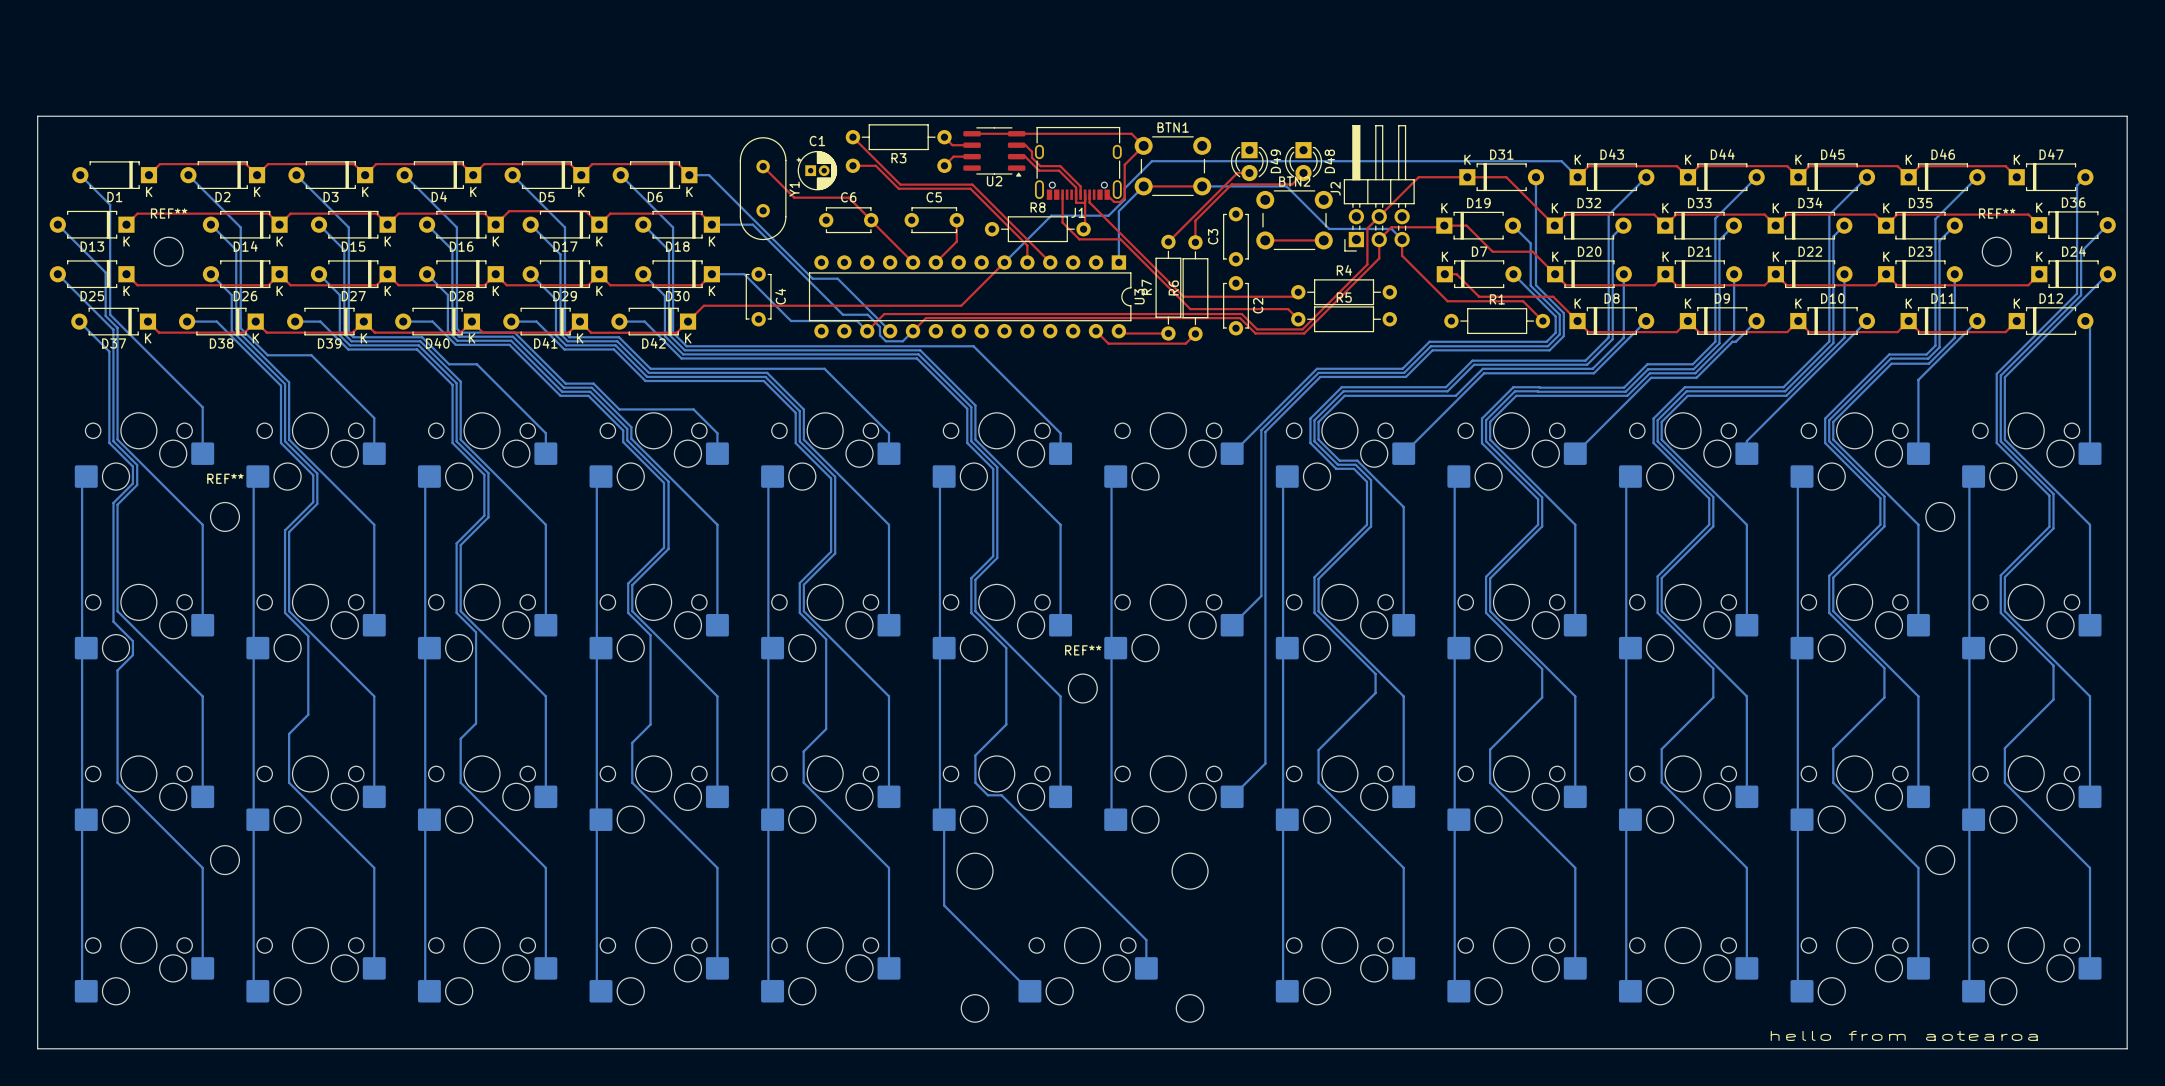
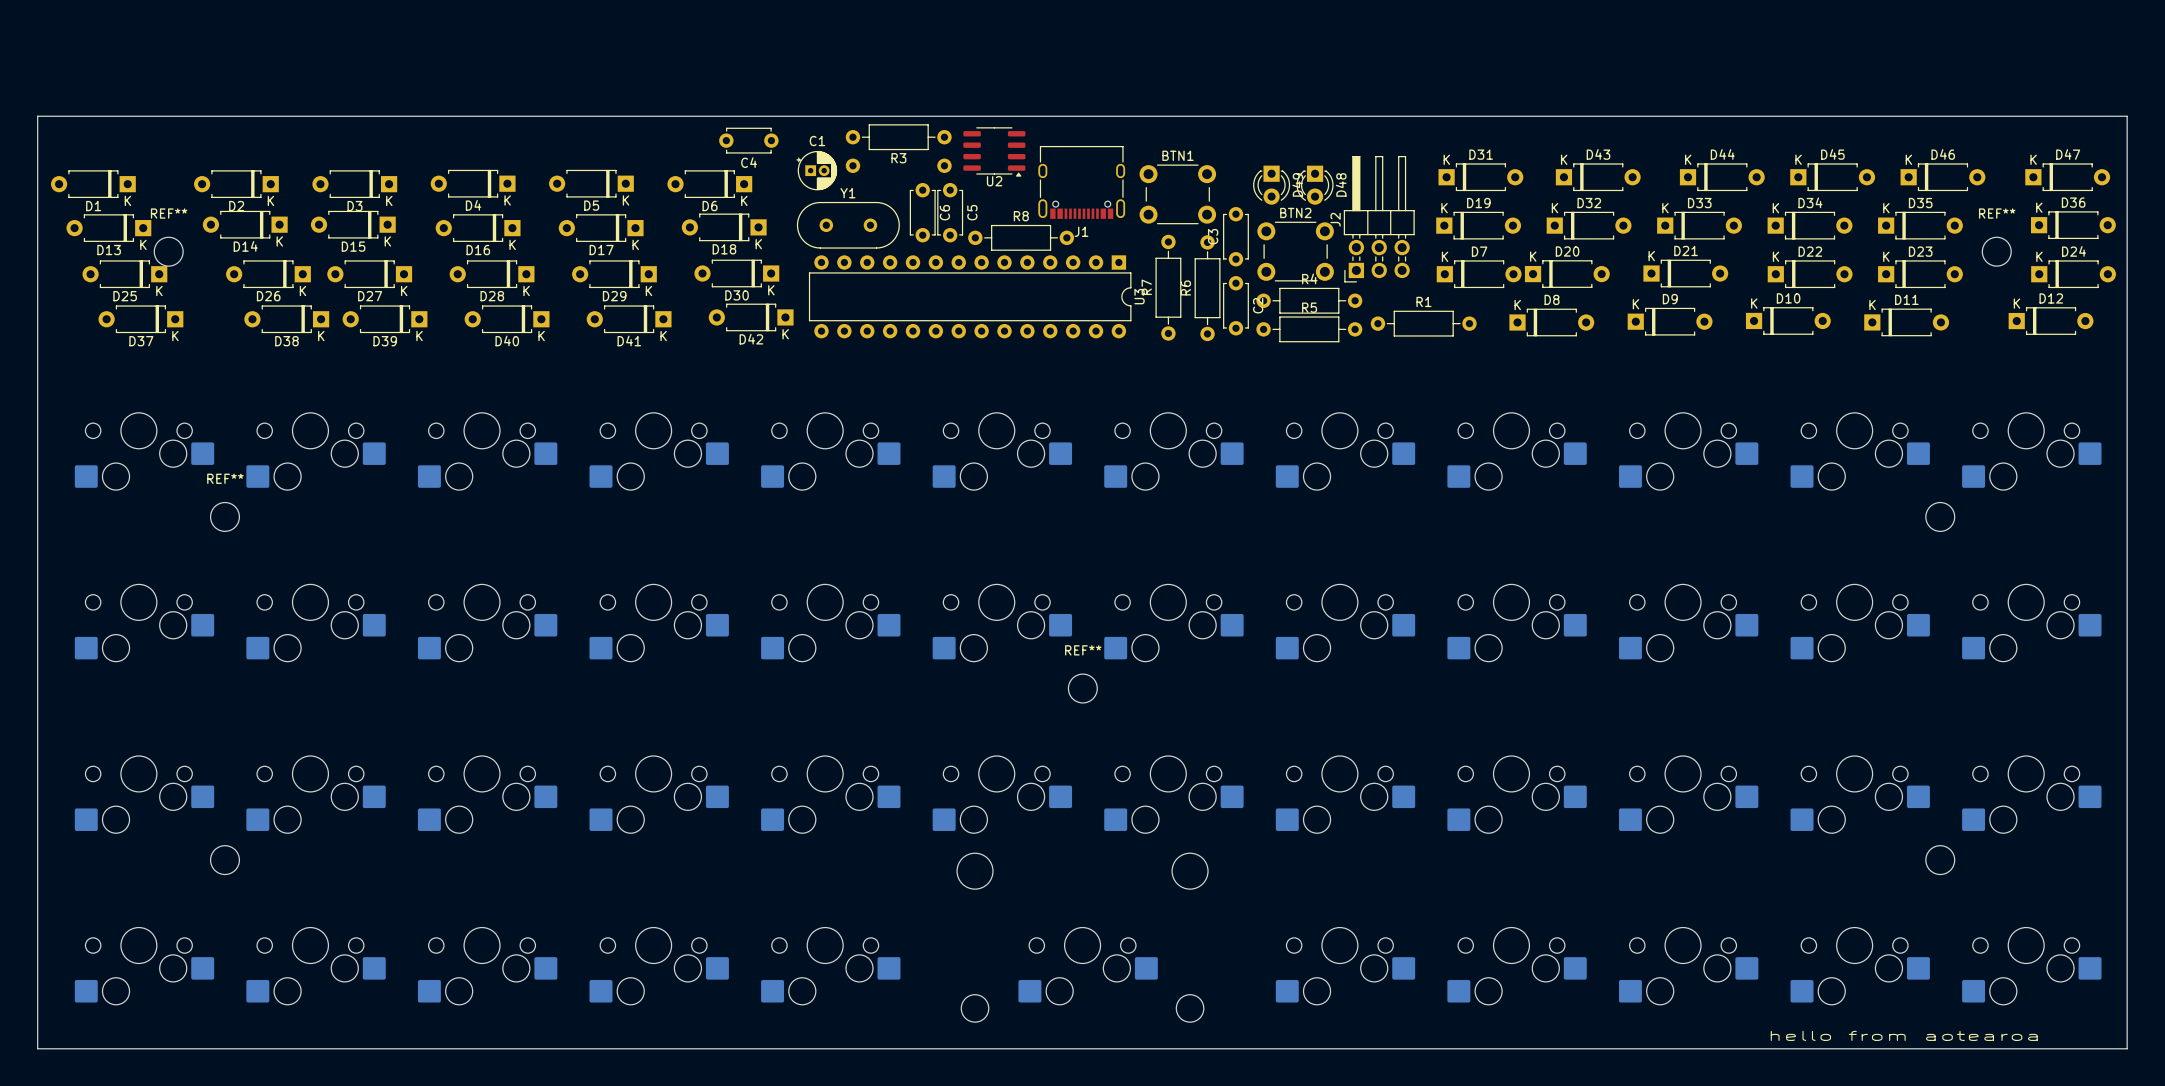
top track: (972, 133) (1131, 133) (1143, 145) (1124, 164) (1124, 197) (1120, 202) (1114, 202) (1108, 194) -> none
top track: (852, 137) (900, 184) (972, 184) (1050, 262) -> none
top track: (944, 137) (952, 145) (972, 145) -> none
D49 footprint: [1231, 142, 1268, 182] -> [1253, 165, 1291, 205]
D48 footprint: [1285, 142, 1322, 182] -> [1296, 165, 1334, 205]
top track: (1016, 145) (1025, 145) (1032, 151) (1032, 157) (1040, 166) (1060, 166) (1080, 186) (1080, 194) -> none
top track: (972, 156) (953, 156) (944, 165) -> none
top track: (1016, 156) (1025, 156) (1039, 170) (1059, 170) (1076, 187) (1076, 202) (1085, 202) -> none
J1 position: (1078, 163) -> (1081, 182)
top track: (852, 165) (875, 165) (898, 188) (970, 188) (1027, 245) (1027, 262) -> none
top track: (763, 166) (794, 197) (848, 197) (913, 262) -> none
BTN1 position: (1172, 166) -> (1177, 194)
top track: (1249, 173) (1237, 173) (1168, 241) -> none
top track: (1303, 173) (1292, 184) (1231, 184) (1195, 220) (1195, 242) -> none
bottom track: (80, 175) (110, 204) (110, 314) (202, 407) (202, 453) -> none
D1 position: (114, 175) -> (93, 184)
top track: (148, 175) (160, 164) (246, 164) (257, 175) (268, 164) (354, 164) (365, 175) (376, 164) (462, 164) (473, 175) (484, 164) (570, 164) (581, 175) (592, 164) (678, 164) (689, 175) -> none
bottom track: (188, 175) (240, 227) (240, 328) (267, 355) (311, 355) (374, 418) (374, 453) -> none
D2 position: (222, 175) -> (236, 184)
bottom track: (296, 175) (348, 227) (348, 332) (353, 337) (422, 337) (449, 364) (476, 364) (545, 433) (545, 453) -> none
D3 position: (330, 175) -> (354, 184)
bottom track: (404, 175) (456, 227) (456, 328) (460, 332) (514, 332) (565, 383) (593, 383) (619, 409) (693, 409) (717, 433) (717, 453) -> none
D4 position: (438, 175) -> (473, 183)
bottom track: (512, 175) (564, 227) (564, 332) (569, 337) (619, 337) (650, 368) (824, 368) (889, 433) (889, 453) -> none
D5 position: (546, 175) -> (591, 183)
bottom track: (620, 175) (673, 227) (673, 332) (686, 346) (973, 346) (1060, 433) (1060, 453) -> none
D6 position: (655, 175) -> (709, 184)
bottom track: (689, 175) (709, 175) (812, 278) (837, 278) (890, 331) -> none
D31 position: (1501, 177) -> (1480, 177)
bottom track: (1535, 177) (1535, 285) (1563, 313) (1563, 336) (1549, 350) (1432, 350) (1405, 376) (1320, 376) (1265, 431) (1265, 763) (1232, 796) -> none
top track: (1577, 177) (1588, 166) (1676, 166) (1688, 177) (1699, 166) (1787, 166) (1798, 177) (1809, 166) (1897, 166) (1908, 177) (1919, 166) (2005, 166) (2016, 177) -> none
bottom track: (1577, 177) (1561, 161) (1151, 161) (1124, 188) (1124, 199) (1108, 215) (1051, 215) (1004, 262) -> none
D43 position: (1611, 177) -> (1598, 177)
bottom track: (1646, 177) (1608, 214) (1608, 337) (1585, 360) (1472, 360) (1445, 387) (1341, 387) (1310, 418) (1310, 443) (1336, 468) (1353, 468) (1367, 481) (1367, 524) (1314, 577) (1314, 612) (1375, 673) (1375, 693) (1318, 750) (1318, 782) (1403, 867) (1403, 968) -> none
bottom track: (1756, 177) (1715, 218) (1715, 341) (1692, 364) (1647, 364) (1624, 387) (1513, 387) (1482, 418) (1482, 443) (1538, 499) (1538, 524) (1486, 576) (1486, 612) (1542, 669) (1542, 697) (1490, 749) (1490, 782) (1575, 867) (1575, 968) -> none
bottom track: (1866, 177) (1829, 214) (1829, 341) (1783, 387) (1684, 387) (1653, 418) (1653, 443) (1709, 498) (1709, 524) (1657, 576) (1657, 612) (1713, 668) (1713, 697) (1661, 749) (1661, 782) (1746, 867) (1746, 968) -> none
bottom track: (1977, 177) (1935, 219) (1935, 345) (1926, 354) (1889, 354) (1825, 418) (1825, 443) (1880, 498) (1880, 524) (1829, 575) (1829, 612) (1884, 668) (1884, 697) (1833, 748) (1833, 782) (1918, 867) (1918, 968) -> none
D47 position: (2051, 177) -> (2067, 177)
bottom track: (2085, 177) (2077, 185) (2077, 293) (1996, 373) (1996, 443) (2049, 495) (2049, 526) (2000, 575) (2000, 612) (2053, 665) (2053, 699) (2004, 748) (2004, 782) (2090, 867) (2090, 968) -> none
top track: (1143, 186) (1202, 186) -> none
bottom track: (1143, 186) (1118, 211) (1118, 262) -> none
bottom track: (1202, 186) (1286, 186) (1329, 228) (1391, 228) (1402, 239) -> none
Y1 rotation: 0° (763, 188) -> 90° clockwise (848, 225)
Y1 position: (763, 188) -> (848, 225)
J2 position: (1379, 188) -> (1379, 219)
Y1 name position: Y1 (794, 189) -> Y1 (847, 193)
top track: (1062, 194) (1062, 222) (1079, 239) (1120, 239) (1190, 309) (1288, 309) (1298, 319) -> none
top track: (1085, 194) (1083, 229) -> none
top track: (1089, 194) (1089, 202) (1183, 296) (1293, 296) (1298, 292) -> none
C6 rotation: 0° (848, 220) -> 90° clockwise (922, 212)
C6 position: (848, 220) -> (922, 212)
C5 rotation: 0° (934, 220) -> 90° clockwise (950, 212)
top track: (956, 220) (956, 241) (935, 262) -> none
BTN2 position: (1294, 220) -> (1295, 251)
bottom track: (57, 224) (105, 272) (105, 315) (117, 327) (117, 439) (202, 524) (202, 625) -> none
D13 position: (92, 224) -> (108, 228)
top track: (126, 224) (137, 213) (268, 213) (279, 224) (290, 213) (376, 213) (387, 224) (398, 213) (484, 213) (495, 224) (509, 211) (585, 211) (599, 224) (610, 213) (700, 213) (711, 224) -> none
bottom track: (210, 224) (236, 249) (236, 329) (289, 382) (289, 439) (374, 524) (374, 625) -> none
bottom track: (319, 224) (344, 249) (344, 334) (351, 341) (420, 341) (460, 381) (460, 439) (545, 524) (545, 625) -> none
bottom track: (427, 224) (452, 249) (452, 329) (459, 336) (512, 336) (563, 387) (591, 387) (631, 427) (631, 438) (717, 524) (717, 625) -> none
D16 position: (461, 224) -> (478, 228)
bottom track: (530, 224) (560, 254) (560, 334) (567, 341) (617, 341) (648, 372) (767, 372) (803, 409) (803, 439) (889, 524) (889, 625) -> none
D17 position: (564, 224) -> (601, 228)
bottom track: (643, 224) (669, 250) (669, 334) (684, 350) (920, 350) (975, 405) (975, 439) (1060, 524) (1060, 625) -> none
D18 position: (677, 224) -> (724, 227)
bottom track: (711, 224) (752, 224) (842, 314) (867, 314) (879, 326) (879, 335) (885, 341) (902, 341) (913, 331) -> none
bottom track: (1512, 225) (1530, 243) (1530, 285) (1559, 314) (1559, 334) (1547, 346) (1430, 346) (1404, 372) (1318, 372) (1261, 430) (1261, 596) (1232, 625) -> none
bottom track: (1623, 225) (1612, 236) (1612, 339) (1587, 364) (1474, 364) (1447, 391) (1343, 391) (1314, 420) (1314, 441) (1337, 464) (1355, 464) (1371, 480) (1371, 526) (1318, 578) (1318, 611) (1403, 696) (1403, 796) -> none
bottom track: (1733, 225) (1719, 240) (1719, 343) (1693, 369) (1648, 369) (1625, 391) (1515, 391) (1486, 420) (1486, 441) (1542, 497) (1542, 526) (1490, 578) (1490, 611) (1575, 696) (1575, 796) -> none
bottom track: (1844, 225) (1833, 236) (1833, 343) (1785, 391) (1686, 391) (1657, 420) (1657, 441) (1713, 496) (1713, 526) (1661, 578) (1661, 611) (1746, 696) (1746, 796) -> none
bottom track: (1954, 225) (1939, 240) (1939, 347) (1928, 358) (1890, 358) (1829, 420) (1829, 441) (1884, 496) (1884, 526) (1833, 577) (1833, 611) (1918, 696) (1918, 796) -> none
top track: (2039, 225) (2028, 214) (1897, 214) (1886, 225) (1875, 214) (1786, 214) (1775, 225) (1764, 214) (1676, 214) (1665, 225) (1654, 214) (1565, 214) (1554, 225) (1506, 177) (1418, 177) (1367, 228) (1367, 264) (1302, 329) (1257, 329) (1241, 314) (884, 314) (867, 331) -> none
bottom track: (2107, 225) (2081, 251) (2081, 295) (2000, 375) (2000, 441) (2053, 494) (2053, 528) (2004, 577) (2004, 611) (2090, 696) (2090, 796) -> none
R8 position: (1037, 229) -> (1021, 237)
top track: (1402, 239) (1402, 255) (1447, 301) (1523, 301) (1542, 321) -> none
top track: (1265, 240) (1323, 240) -> none
top track: (1004, 262) (961, 305) (703, 305) (676, 332) (591, 332) (579, 321) (568, 332) (482, 332) (471, 321) (460, 332) (374, 332) (363, 321) (352, 332) (266, 332) (255, 321) (244, 332) (159, 332) (147, 321) -> none
bottom track: (57, 274) (113, 329) (113, 441) (137, 465) (137, 485) (117, 504) (117, 611) (202, 696) (202, 796) -> none
D25 position: (92, 274) -> (124, 274)
top track: (126, 274) (137, 285) (268, 285) (279, 274) (290, 285) (376, 285) (387, 274) (398, 285) (484, 285) (495, 274) (506, 285) (588, 285) (599, 274) (610, 285) (700, 285) (711, 274) -> none
bottom track: (210, 274) (231, 295) (231, 330) (285, 384) (285, 441) (317, 473) (317, 503) (289, 532) (289, 611) (374, 696) (374, 796) -> none
D26 position: (245, 274) -> (268, 274)
bottom track: (319, 274) (339, 295) (339, 335) (349, 345) (418, 345) (456, 383) (456, 441) (488, 473) (488, 517) (460, 545) (460, 611) (545, 696) (545, 796) -> none
D27 position: (353, 274) -> (369, 274)
bottom track: (427, 274) (447, 295) (447, 331) (457, 340) (511, 340) (562, 391) (590, 391) (627, 428) (627, 440) (668, 481) (668, 548) (632, 585) (632, 611) (717, 696) (717, 796) -> none
D28 position: (461, 274) -> (492, 274)
bottom track: (530, 274) (555, 299) (555, 335) (566, 345) (615, 345) (647, 376) (765, 376) (799, 411) (799, 441) (835, 476) (835, 553) (803, 584) (803, 611) (889, 696) (889, 796) -> none
D29 position: (564, 274) -> (614, 274)
bottom track: (643, 274) (664, 295) (664, 336) (683, 354) (918, 354) (971, 407) (971, 441) (997, 467) (997, 557) (975, 579) (975, 611) (1060, 696) (1060, 796) -> none
D30 position: (677, 274) -> (736, 273)
bottom track: (711, 274) (744, 274) (791, 321) (857, 321) (867, 331) -> none
top track: (1444, 274) (1456, 274) (1479, 296) (1553, 296) (1588, 332) (1676, 332) (1687, 321) (1698, 332) (1787, 332) (1798, 321) (1809, 332) (1897, 332) (1908, 321) (1919, 332) (2005, 332) (2016, 321) -> none
bottom track: (1513, 274) (1555, 316) (1555, 332) (1546, 341) (1429, 341) (1402, 368) (1317, 368) (1232, 453) -> none
D20 position: (1589, 274) -> (1567, 274)
bottom track: (1623, 274) (1623, 337) (1592, 368) (1482, 368) (1455, 395) (1344, 395) (1318, 421) (1318, 439) (1339, 460) (1357, 460) (1403, 507) (1403, 625) -> none
D21 position: (1699, 274) -> (1685, 273)
bottom track: (1734, 274) (1734, 334) (1695, 373) (1649, 373) (1627, 395) (1516, 395) (1490, 421) (1490, 439) (1575, 524) (1575, 625) -> none
bottom track: (1844, 274) (1844, 337) (1786, 395) (1687, 395) (1661, 421) (1661, 439) (1746, 524) (1746, 625) -> none
bottom track: (1954, 274) (1954, 337) (1928, 363) (1891, 363) (1833, 421) (1833, 439) (1918, 524) (1918, 625) -> none
top track: (2039, 274) (2028, 285) (1897, 285) (1886, 274) (1875, 285) (1786, 285) (1775, 274) (1764, 285) (1676, 285) (1665, 274) (1654, 285) (1566, 285) (1532, 251) (1492, 251) (1466, 225) (1391, 227) (1379, 239) (1379, 258) (1304, 333) (1255, 333) (1240, 318) (926, 318) (913, 331) -> none
bottom track: (2107, 274) (2004, 377) (2004, 439) (2090, 524) (2090, 625) -> none
R6 position: (1195, 288) -> (1207, 288)
R4 position: (1344, 292) -> (1309, 300)
C4 rotation: 0° (758, 296) -> 90° clockwise (748, 140)
C4 position: (758, 296) -> (748, 140)
R5 position: (1344, 319) -> (1309, 329)
bottom track: (79, 321) (109, 351) (109, 442) (132, 466) (132, 483) (113, 502) (113, 621) (132, 641) (132, 655) (117, 670) (117, 782) (202, 867) (202, 968) -> none
D37 position: (113, 321) -> (140, 319)
bottom track: (187, 321) (216, 321) (281, 385) (281, 443) (313, 475) (313, 502) (285, 530) (285, 612) (308, 636) (308, 714) (289, 733) (289, 782) (374, 867) (374, 968) -> none
D38 position: (221, 321) -> (286, 319)
bottom track: (295, 321) (320, 321) (348, 349) (417, 349) (452, 384) (452, 443) (484, 474) (484, 515) (456, 543) (456, 612) (476, 632) (476, 723) (460, 738) (460, 782) (545, 867) (545, 968) -> none
D39 position: (329, 321) -> (385, 319)
bottom track: (403, 321) (432, 321) (455, 344) (509, 344) (560, 395) (588, 395) (623, 430) (623, 442) (664, 482) (664, 547) (628, 583) (628, 612) (650, 635) (650, 724) (632, 742) (632, 782) (717, 867) (717, 968) -> none
D40 position: (437, 321) -> (507, 319)
bottom track: (511, 321) (536, 321) (564, 349) (613, 349) (645, 380) (763, 380) (795, 412) (795, 443) (831, 478) (831, 551) (799, 583) (799, 612) (826, 639) (826, 729) (803, 751) (803, 782) (889, 867) (889, 968) -> none
D41 position: (545, 321) -> (629, 319)
bottom track: (619, 321) (644, 321) (681, 358) (916, 358) (967, 408) (967, 443) (993, 468) (993, 556) (971, 578) (971, 613) (1006, 647) (1006, 724) (975, 755) (975, 782) (987, 795) (1001, 795) (1146, 940) (1146, 968) -> none
D42 position: (653, 321) -> (751, 317)
R1 position: (1497, 321) -> (1423, 323)
D8 position: (1611, 321) -> (1551, 322)
bottom track: (1646, 321) (1593, 373) (1484, 373) (1403, 453) -> none
D9 position: (1722, 321) -> (1670, 321)
bottom track: (1756, 321) (1696, 377) (1651, 377) (1575, 453) -> none
D10 position: (1832, 321) -> (1788, 320)
bottom track: (1866, 321) (1746, 441) (1746, 453) -> none
D11 position: (1942, 321) -> (1906, 322)
bottom track: (1977, 321) (1918, 379) (1918, 453) -> none
bottom track: (2085, 321) (2090, 325) (2090, 453) -> none
top track: (1096, 331) (1108, 343) (1185, 343) (1195, 333) -> none
top track: (1118, 331) (1121, 333) (1168, 333) -> none
bottom track: (86, 476) (82, 480) (82, 643) (86, 648) (82, 652) (82, 815) (86, 819) (82, 823) (82, 987) (86, 991) -> none
bottom track: (257, 476) (253, 480) (253, 643) (257, 648) (253, 652) (253, 815) (257, 819) (253, 823) (253, 987) (257, 991) -> none
bottom track: (429, 476) (425, 480) (425, 643) (429, 648) (425, 652) (425, 815) (429, 819) (425, 823) (425, 987) (429, 991) -> none
bottom track: (600, 476) (596, 480) (596, 643) (600, 648) (596, 652) (596, 815) (600, 819) (596, 823) (596, 987) (600, 991) -> none
bottom track: (772, 476) (768, 480) (768, 643) (772, 648) (768, 652) (768, 815) (772, 819) (768, 823) (768, 987) (772, 991) -> none
bottom track: (944, 476) (939, 480) (939, 643) (944, 648) (939, 652) (939, 815) (944, 819) (944, 905) (1029, 991) -> none
bottom track: (1115, 476) (1111, 480) (1111, 643) (1115, 648) (1111, 652) (1111, 815) (1115, 819) -> none
bottom track: (1287, 476) (1283, 480) (1283, 643) (1287, 648) (1283, 652) (1283, 815) (1287, 819) (1283, 823) (1283, 987) (1287, 991) -> none
bottom track: (1458, 476) (1454, 480) (1454, 643) (1458, 648) (1454, 652) (1454, 815) (1458, 819) (1454, 823) (1454, 987) (1458, 991) -> none
bottom track: (1630, 476) (1626, 480) (1626, 643) (1630, 648) (1626, 652) (1626, 815) (1630, 819) (1626, 823) (1626, 987) (1630, 991) -> none
bottom track: (1802, 476) (1797, 480) (1797, 643) (1802, 648) (1797, 652) (1797, 815) (1802, 819) (1797, 823) (1797, 987) (1802, 991) -> none
bottom track: (1973, 476) (1969, 480) (1969, 643) (1973, 648) (1969, 652) (1969, 815) (1973, 819) (1969, 823) (1969, 987) (1973, 991) -> none

